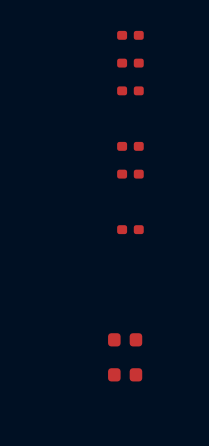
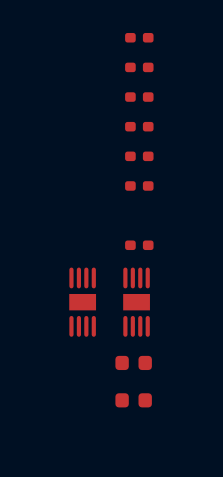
part: none -> (139, 126)
part: none -> (82, 302)
part: none -> (136, 302)

